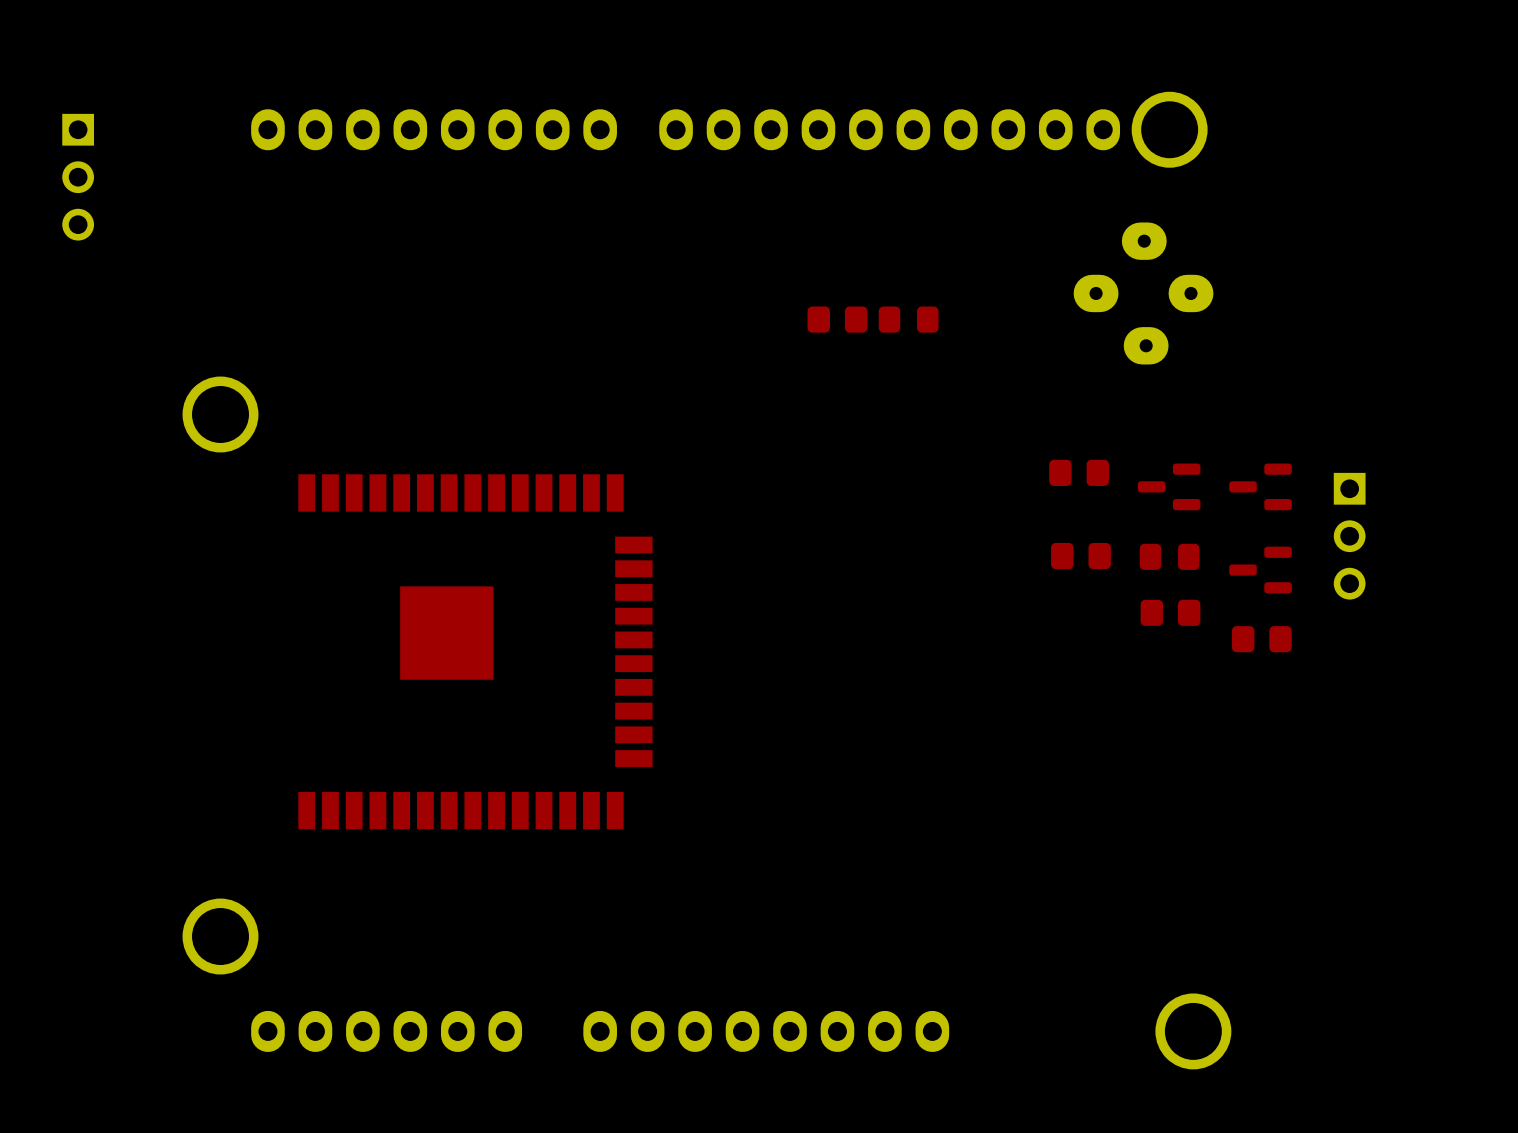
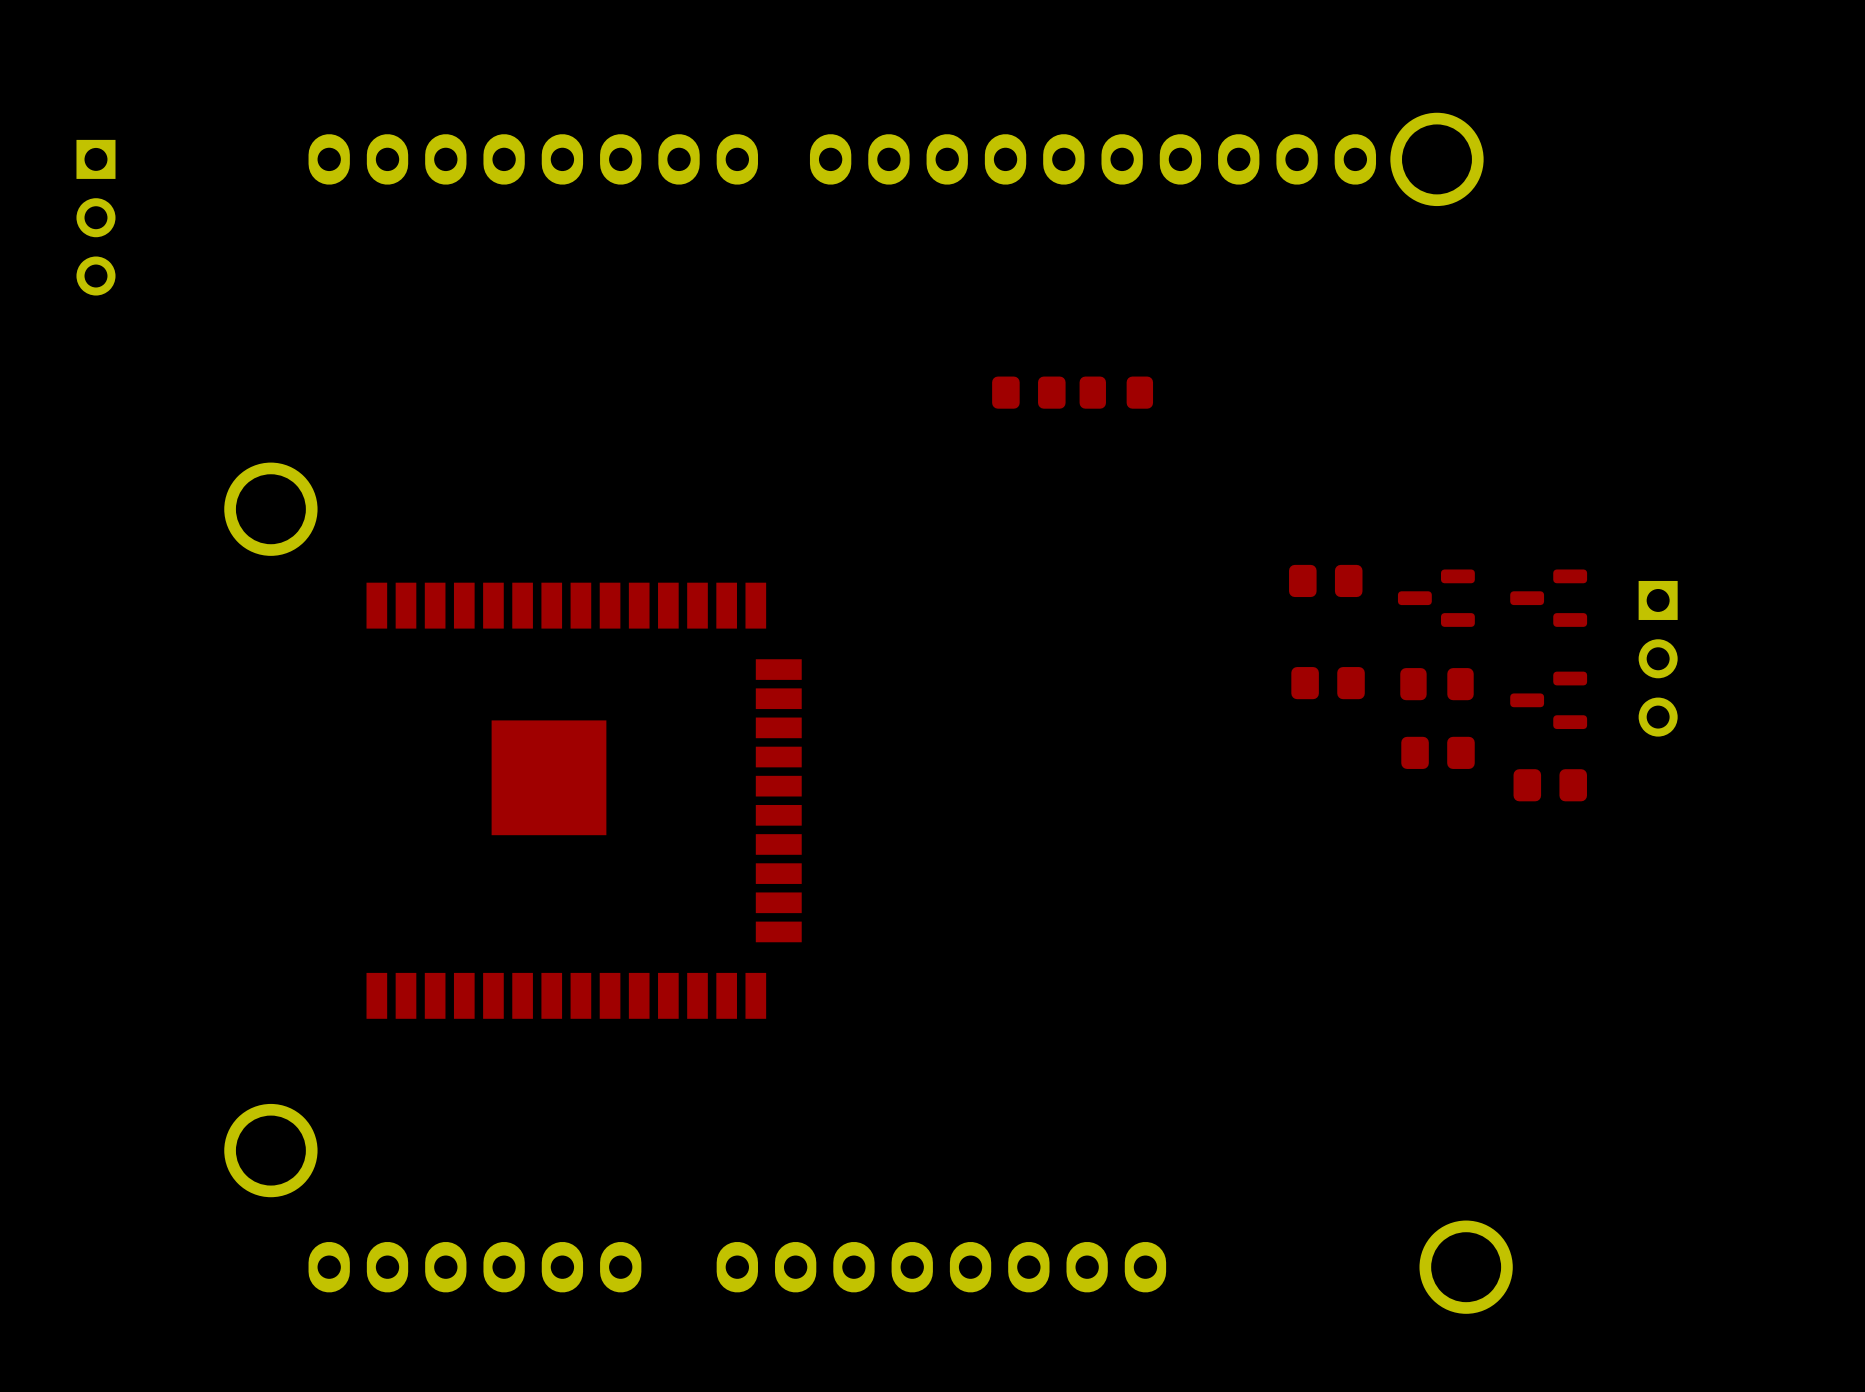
part: (1143, 293) -> none

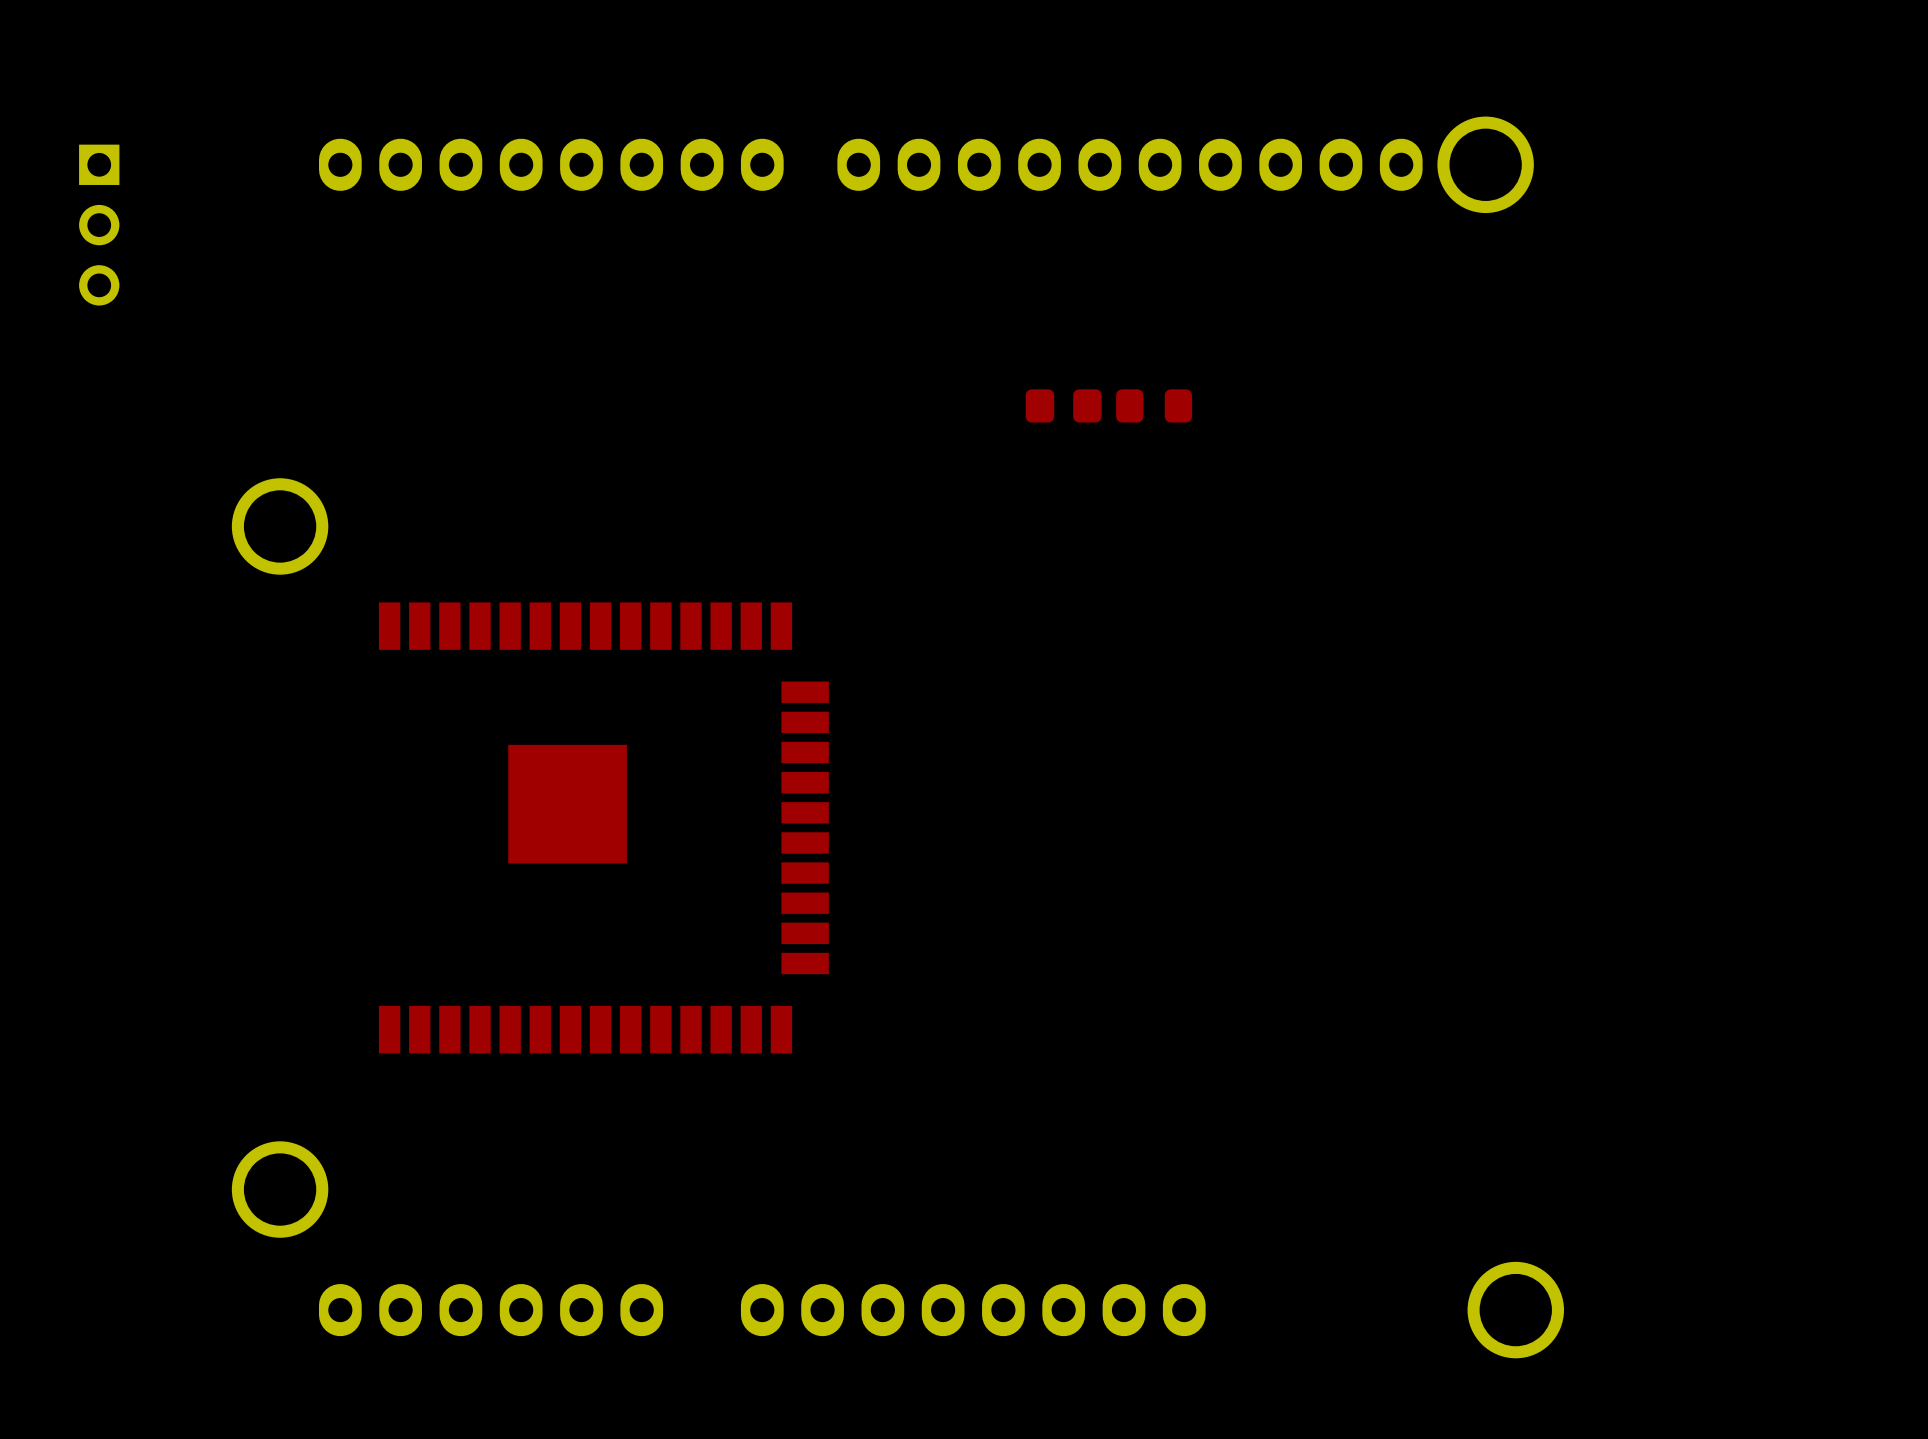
part: (1325, 580) -> none
part: (1436, 598) -> none
part: (1548, 598) -> none
part: (1658, 658) -> none
part: (1328, 683) -> none
part: (1436, 684) -> none
part: (1548, 700) -> none
part: (1438, 752) -> none
part: (1550, 785) -> none

